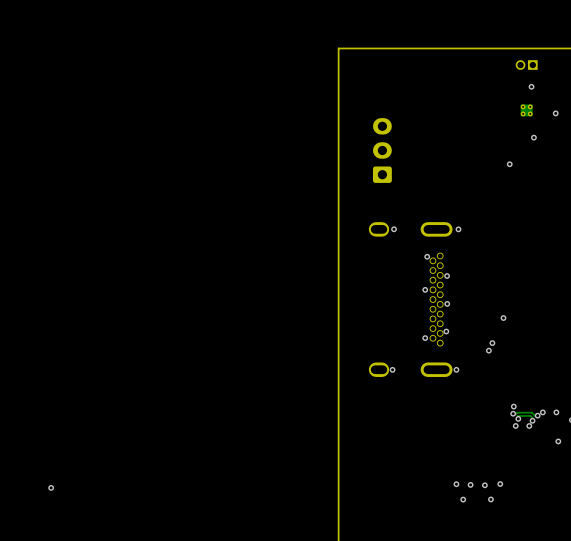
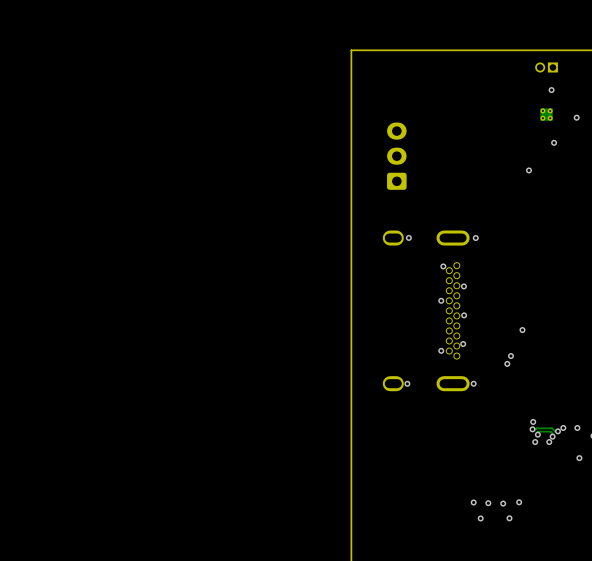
via: (51, 487) -> none

